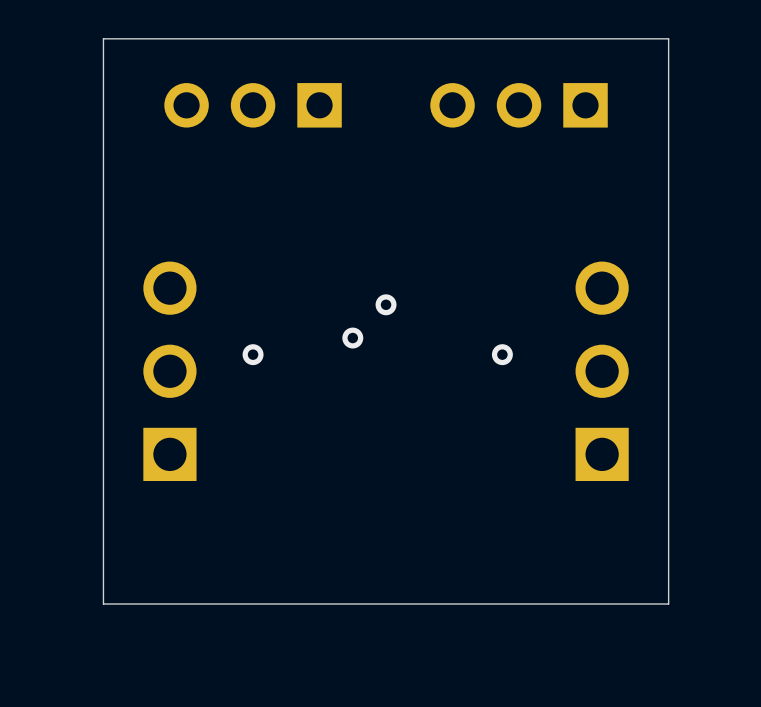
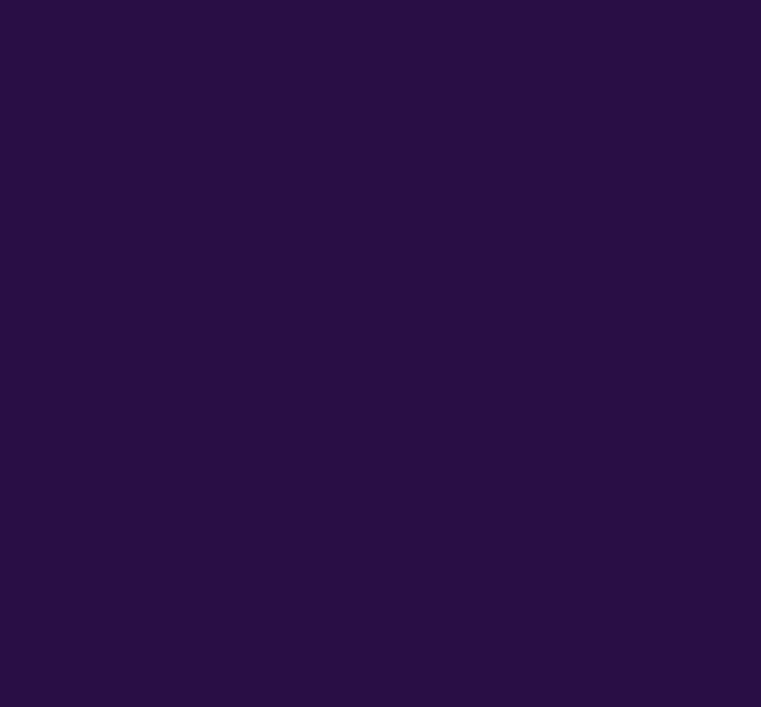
board edge: (668, 38) (668, 604) (103, 604) (103, 38) (668, 38) -> none
part: (253, 105) -> none
part: (519, 105) -> none
via: (386, 304) -> none
via: (352, 338) -> none
via: (253, 354) -> none
via: (502, 354) -> none
part: (169, 371) -> none
part: (602, 371) -> none

